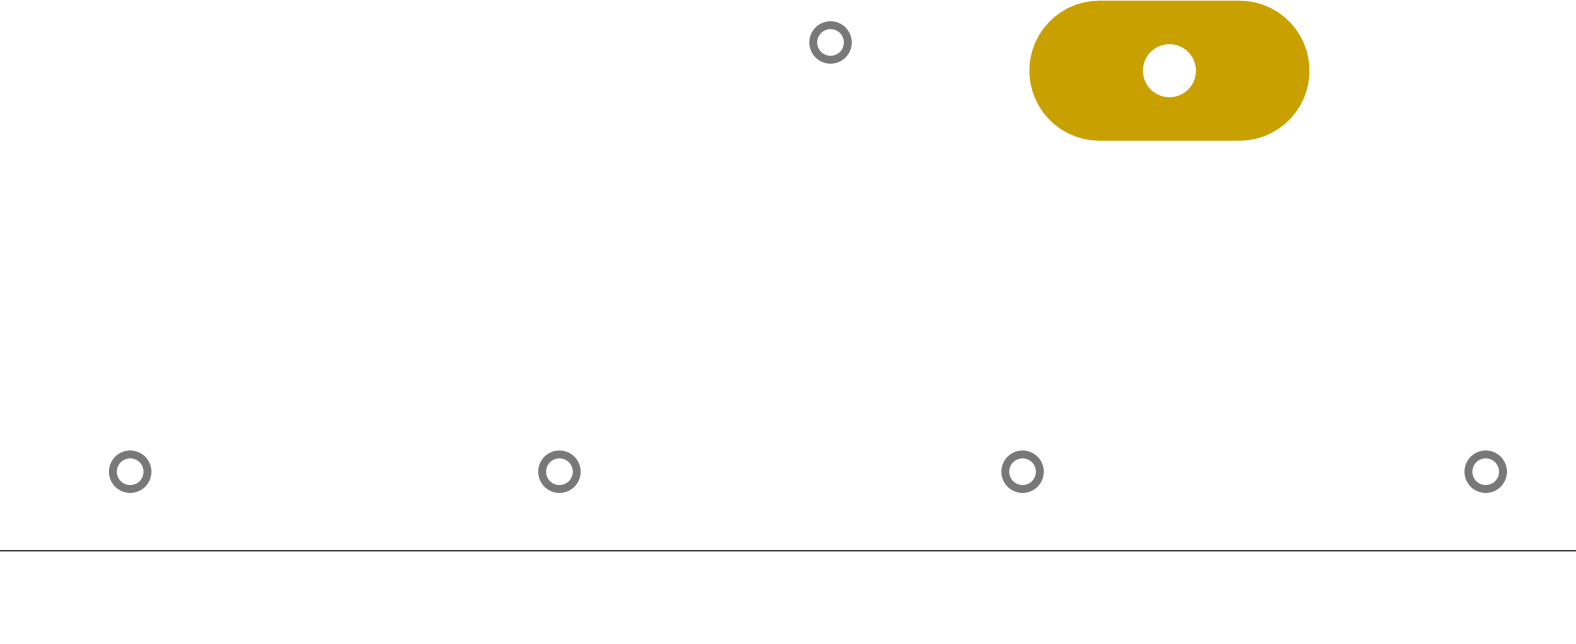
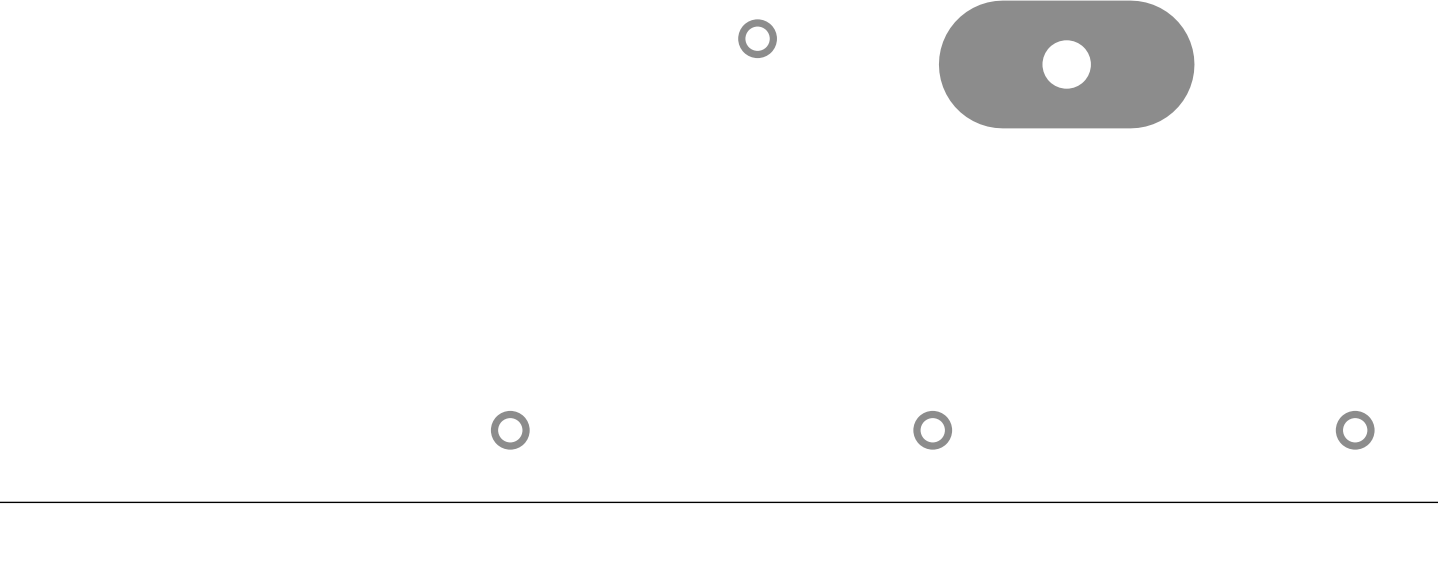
via: (130, 471) -> none

